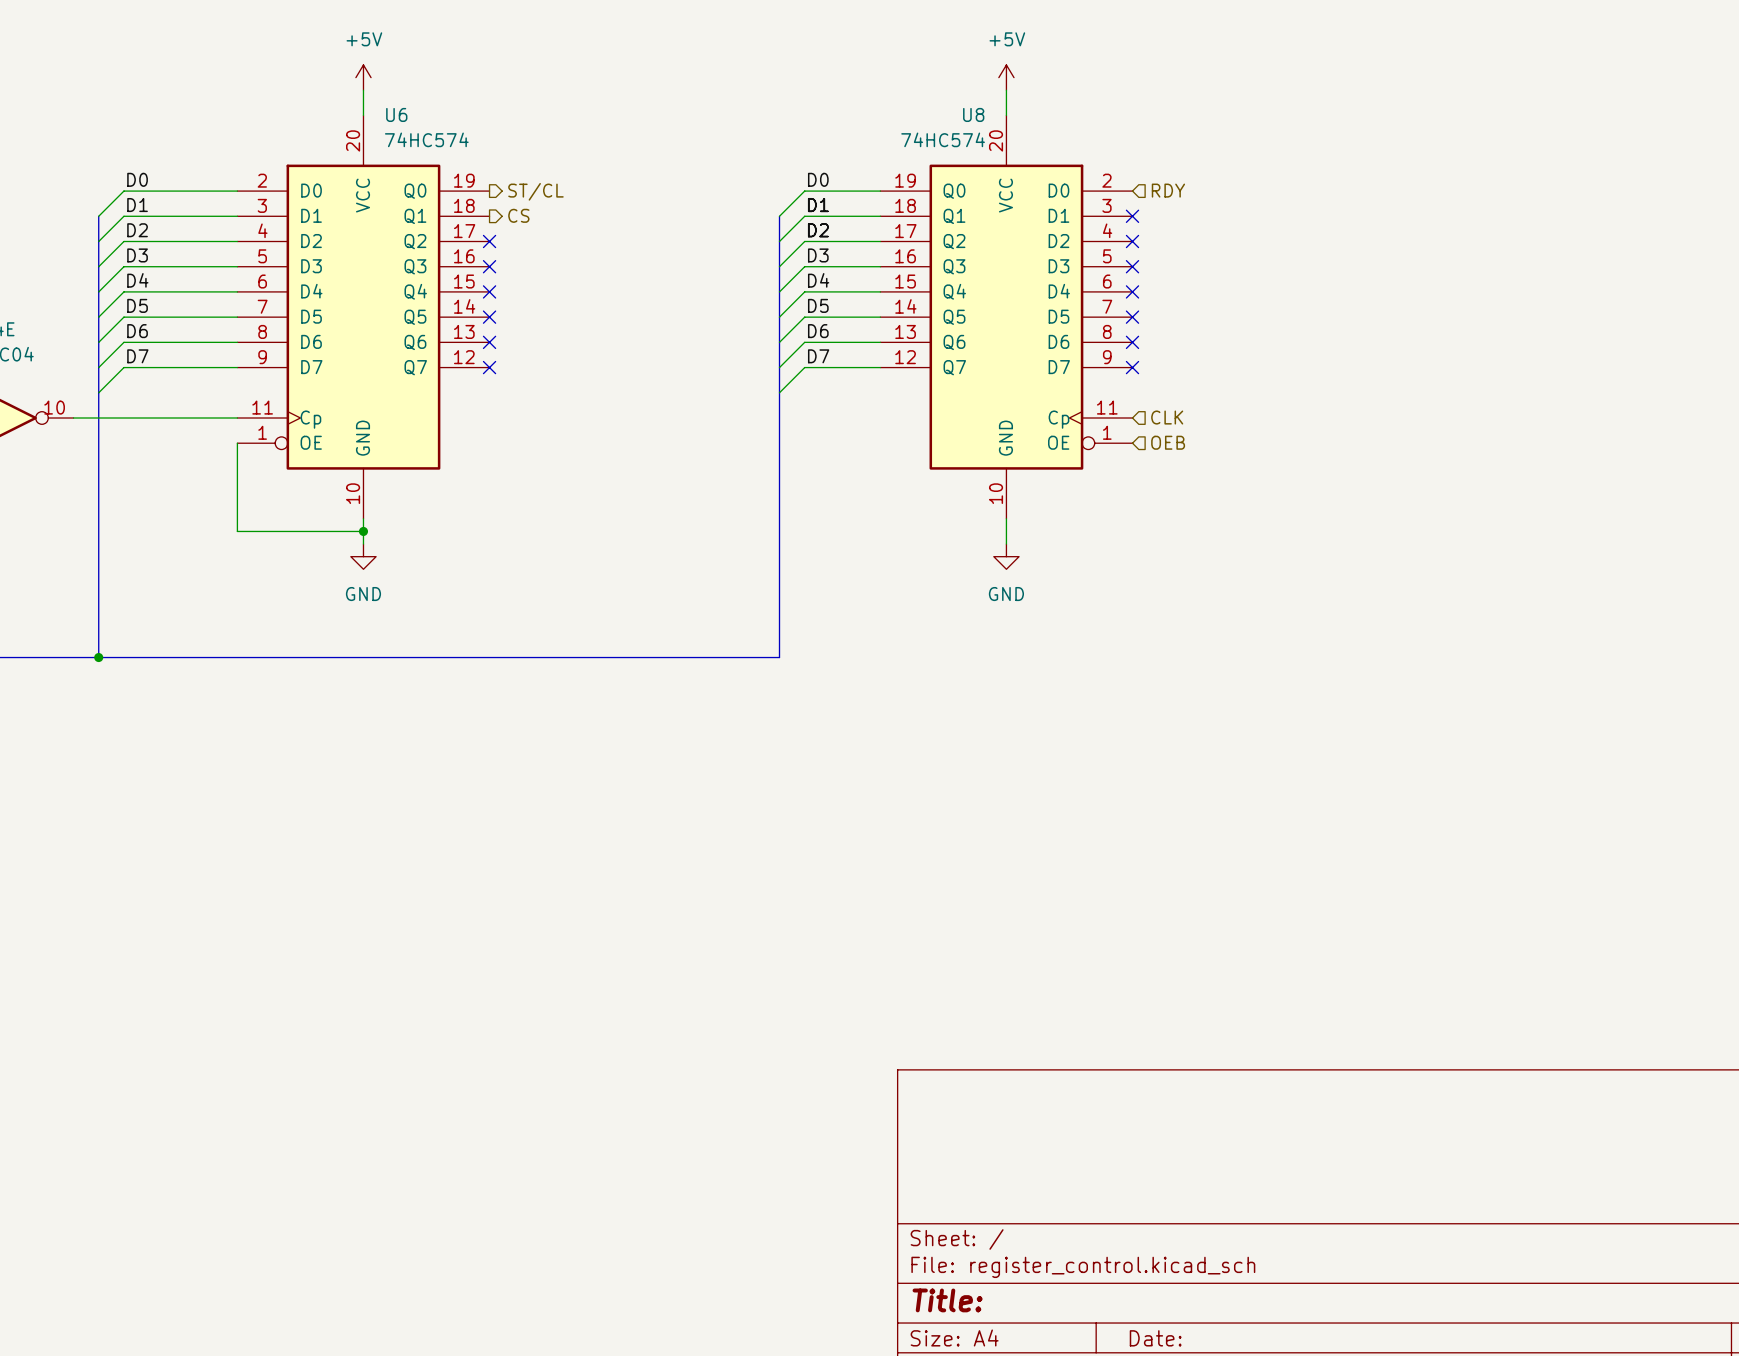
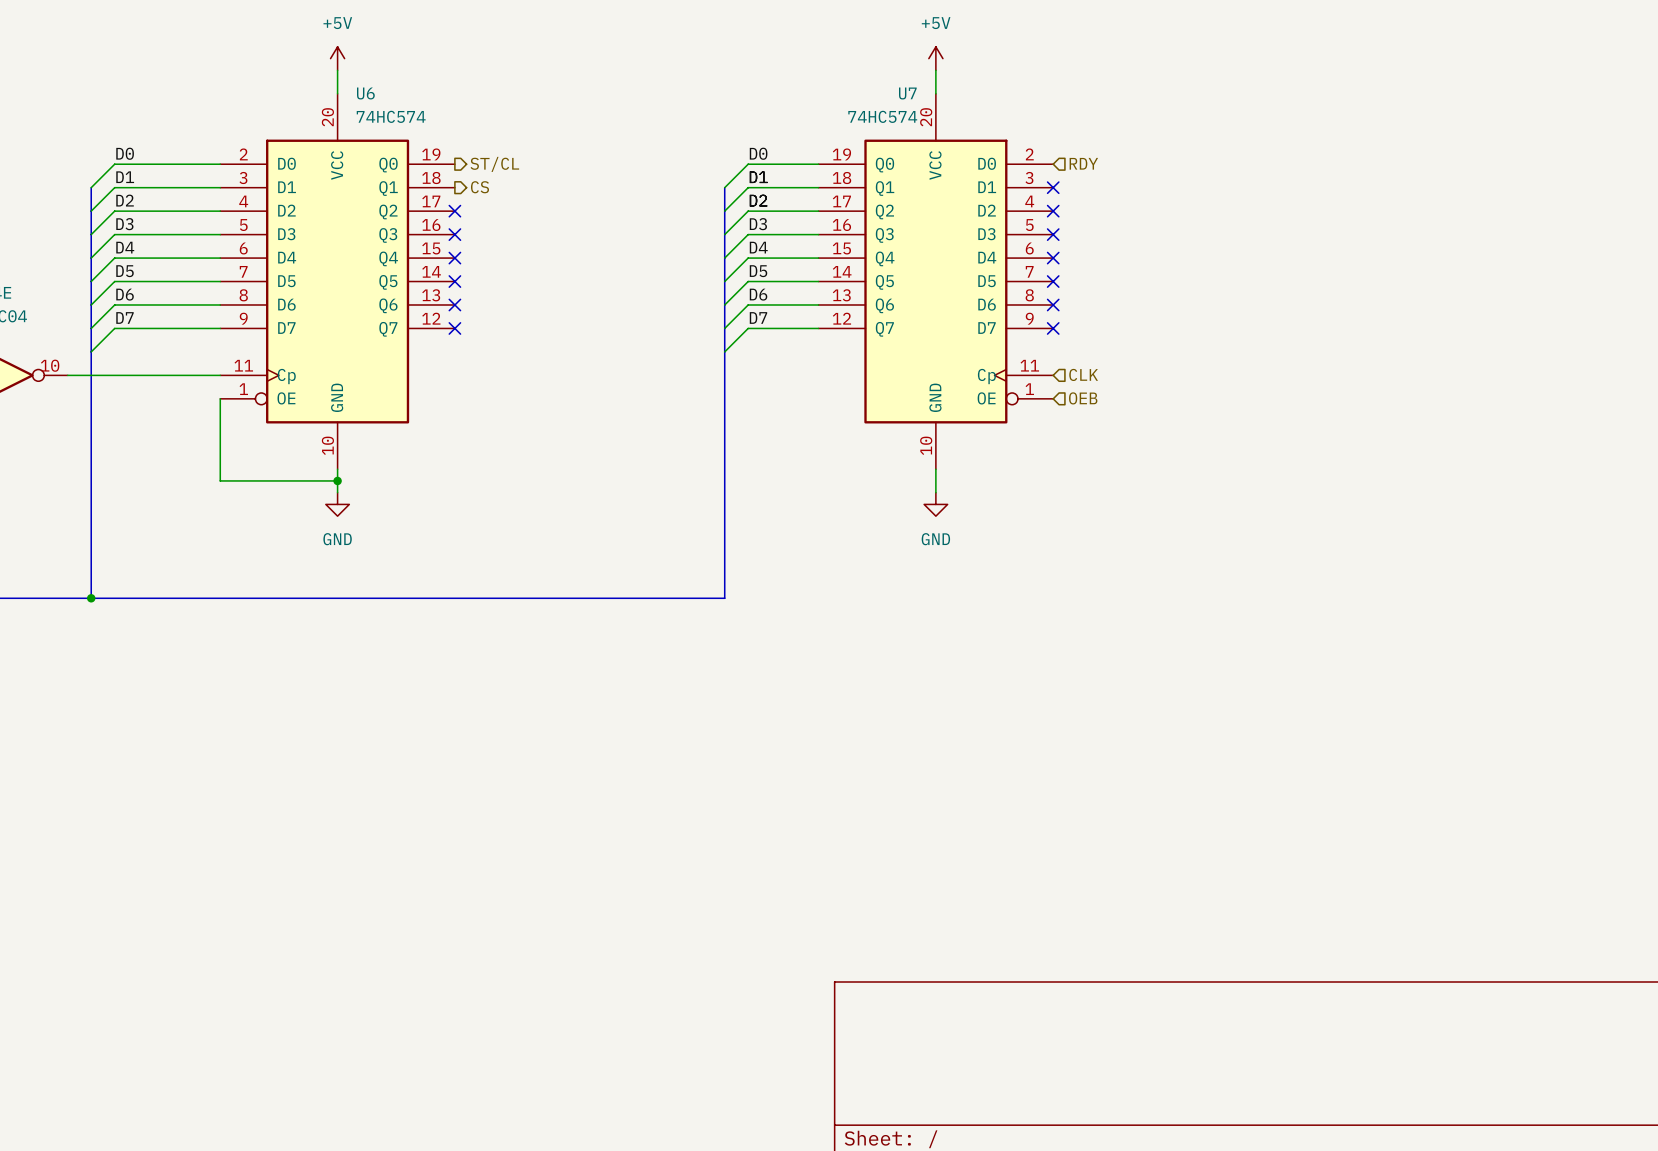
U8 name: U8 (973, 114) -> U7 (907, 93)

